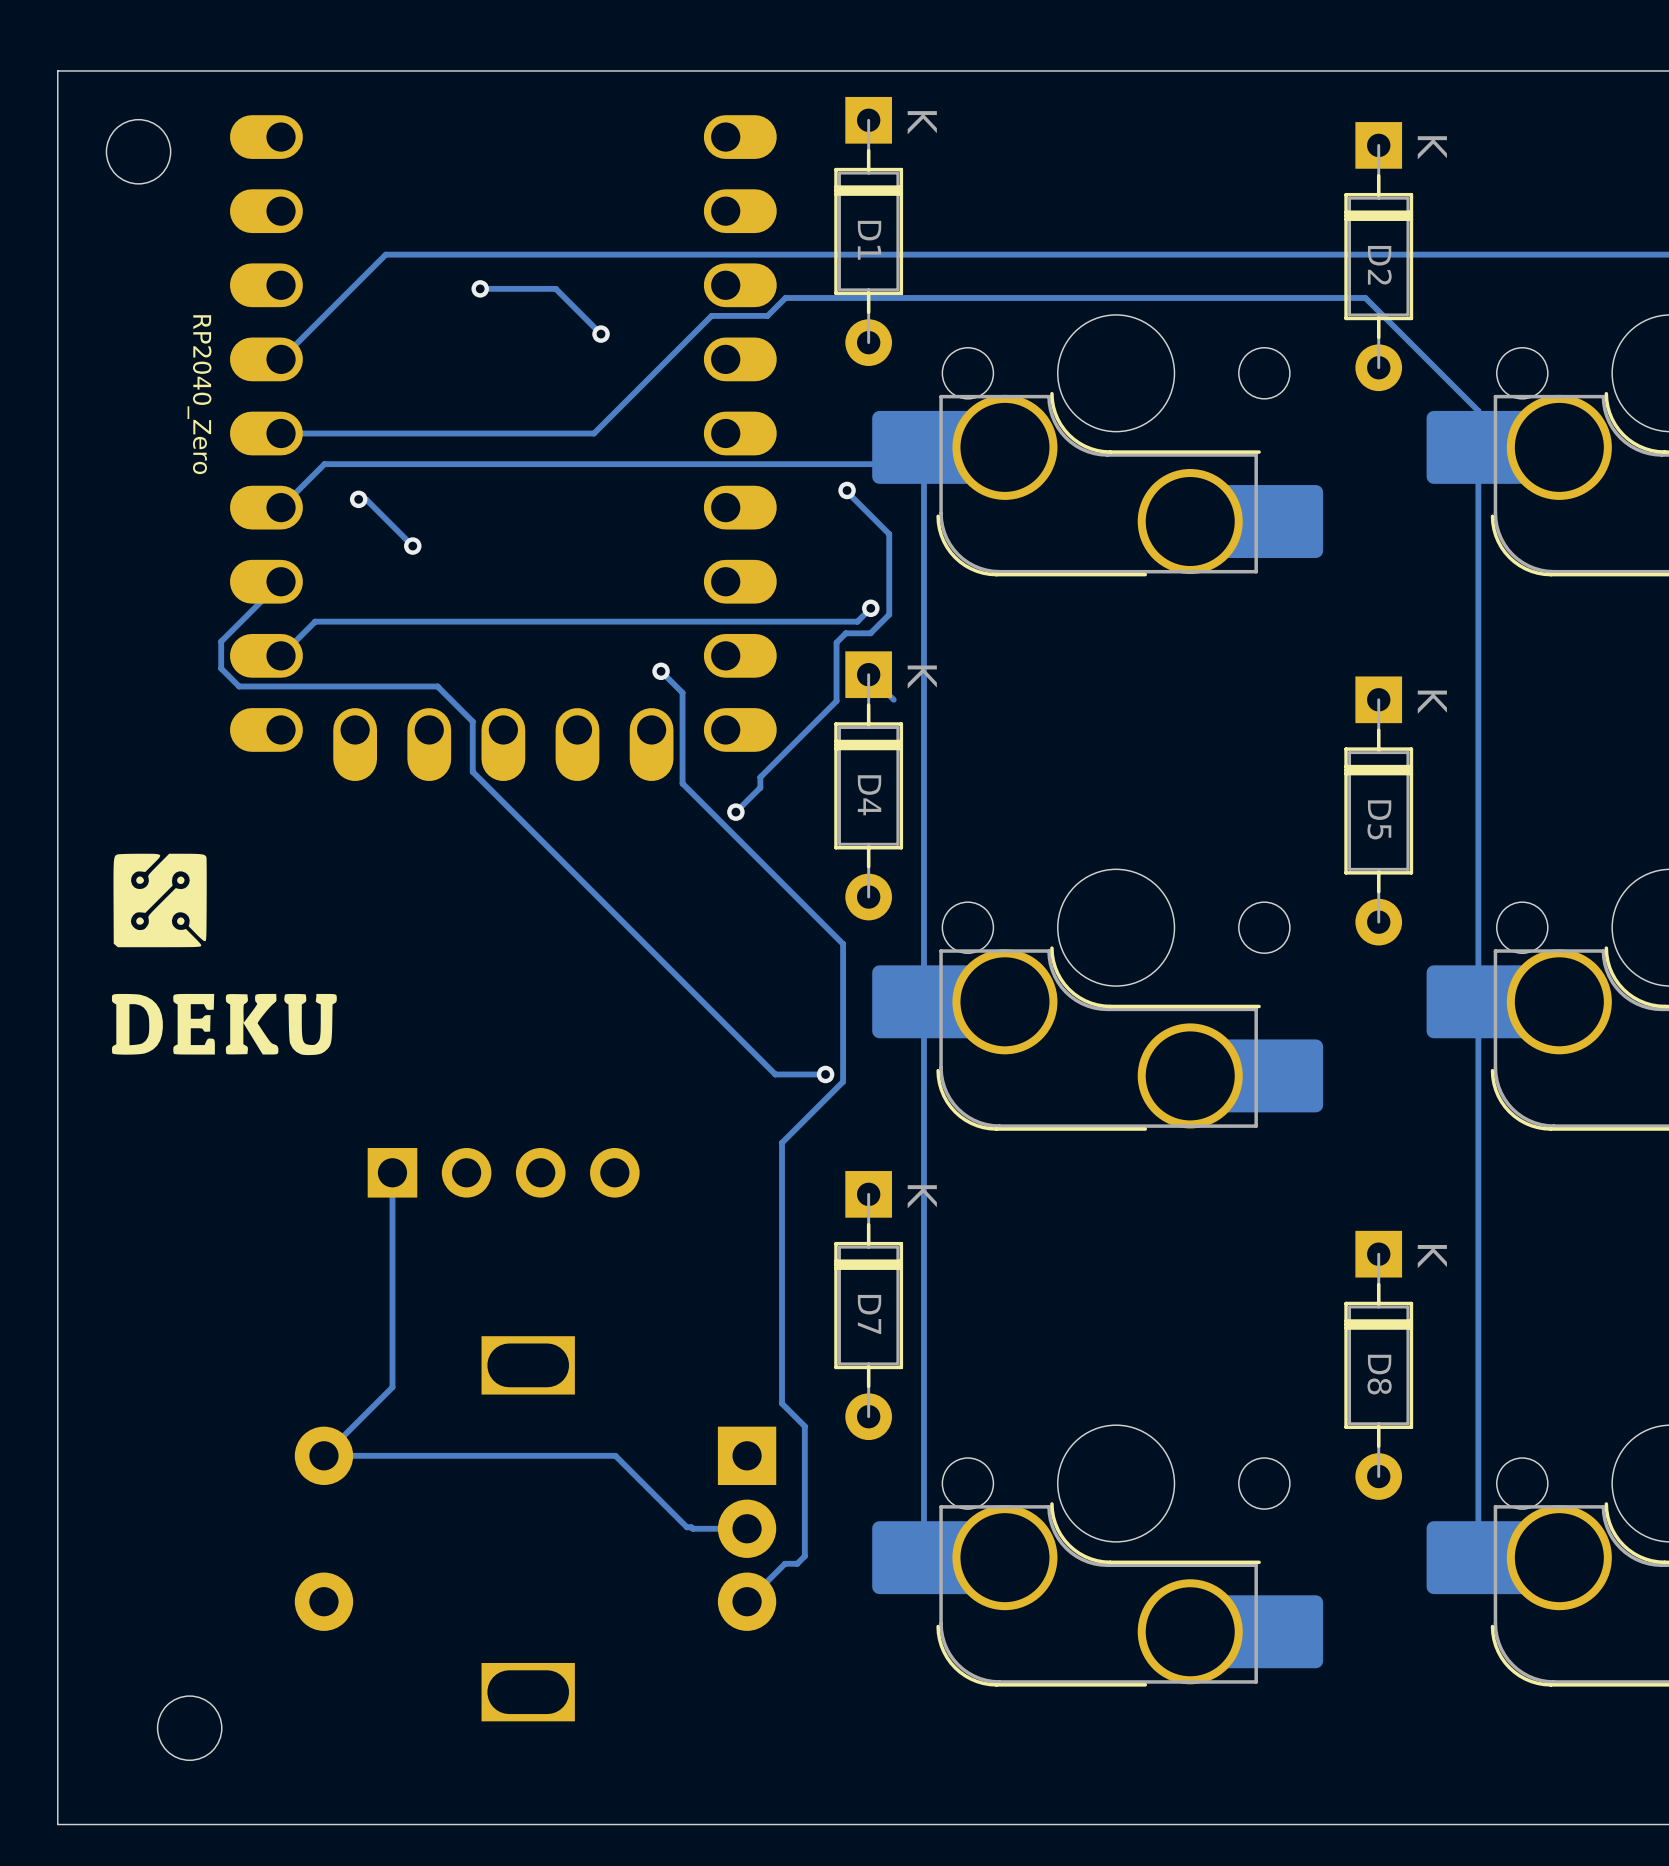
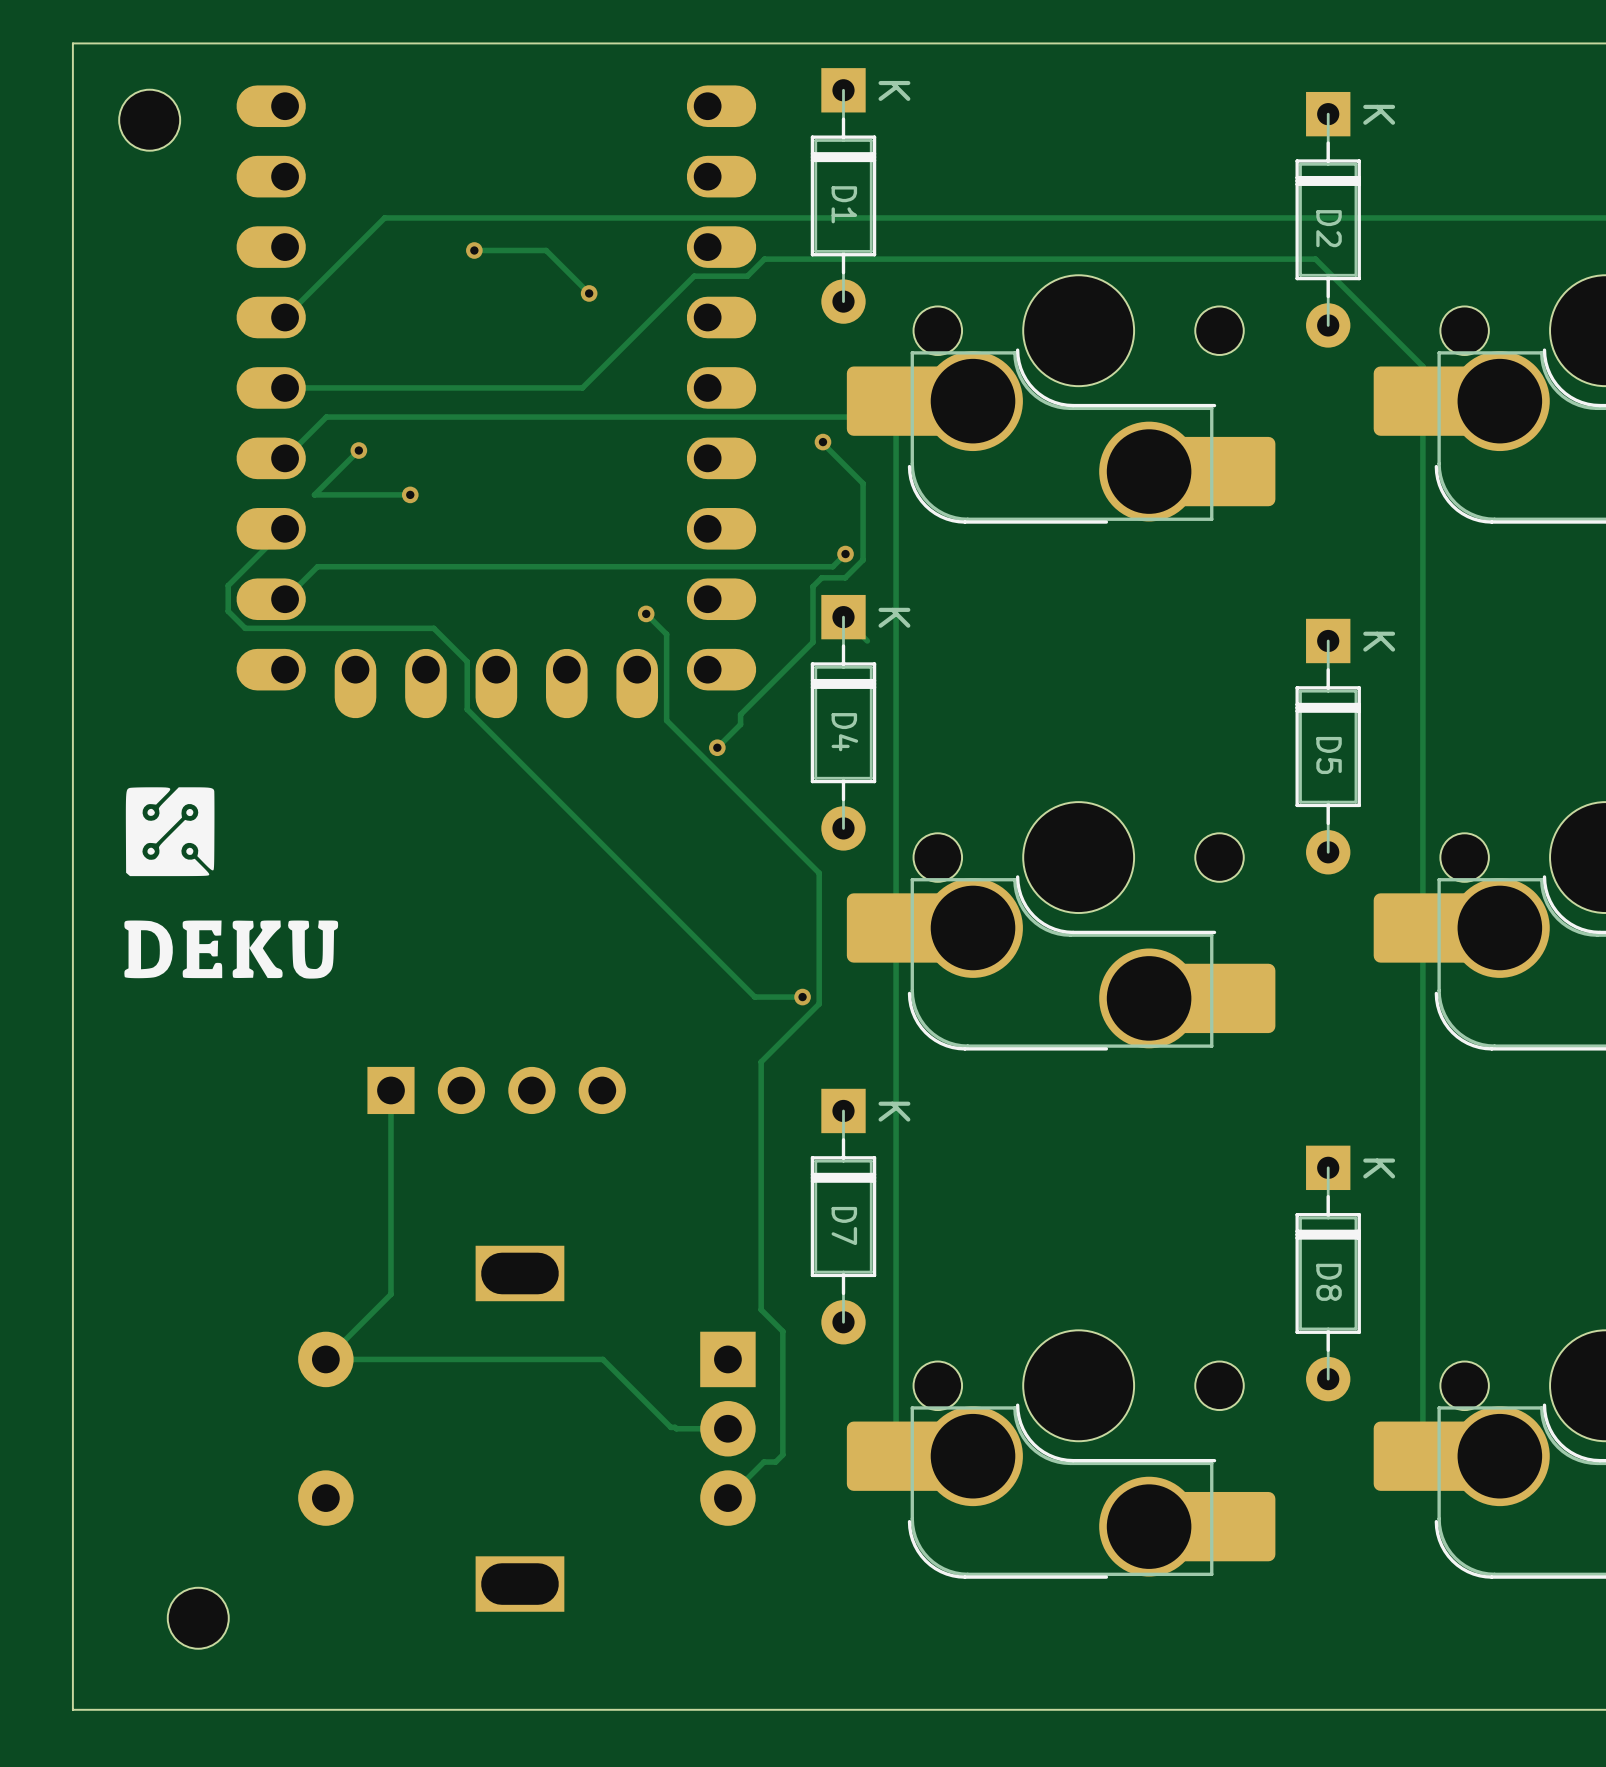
part value: RP2040_Zero (199, 394) -> none
track: (358, 499) (366, 499) (412, 546) -> (358, 450) (314, 494) (410, 494)

